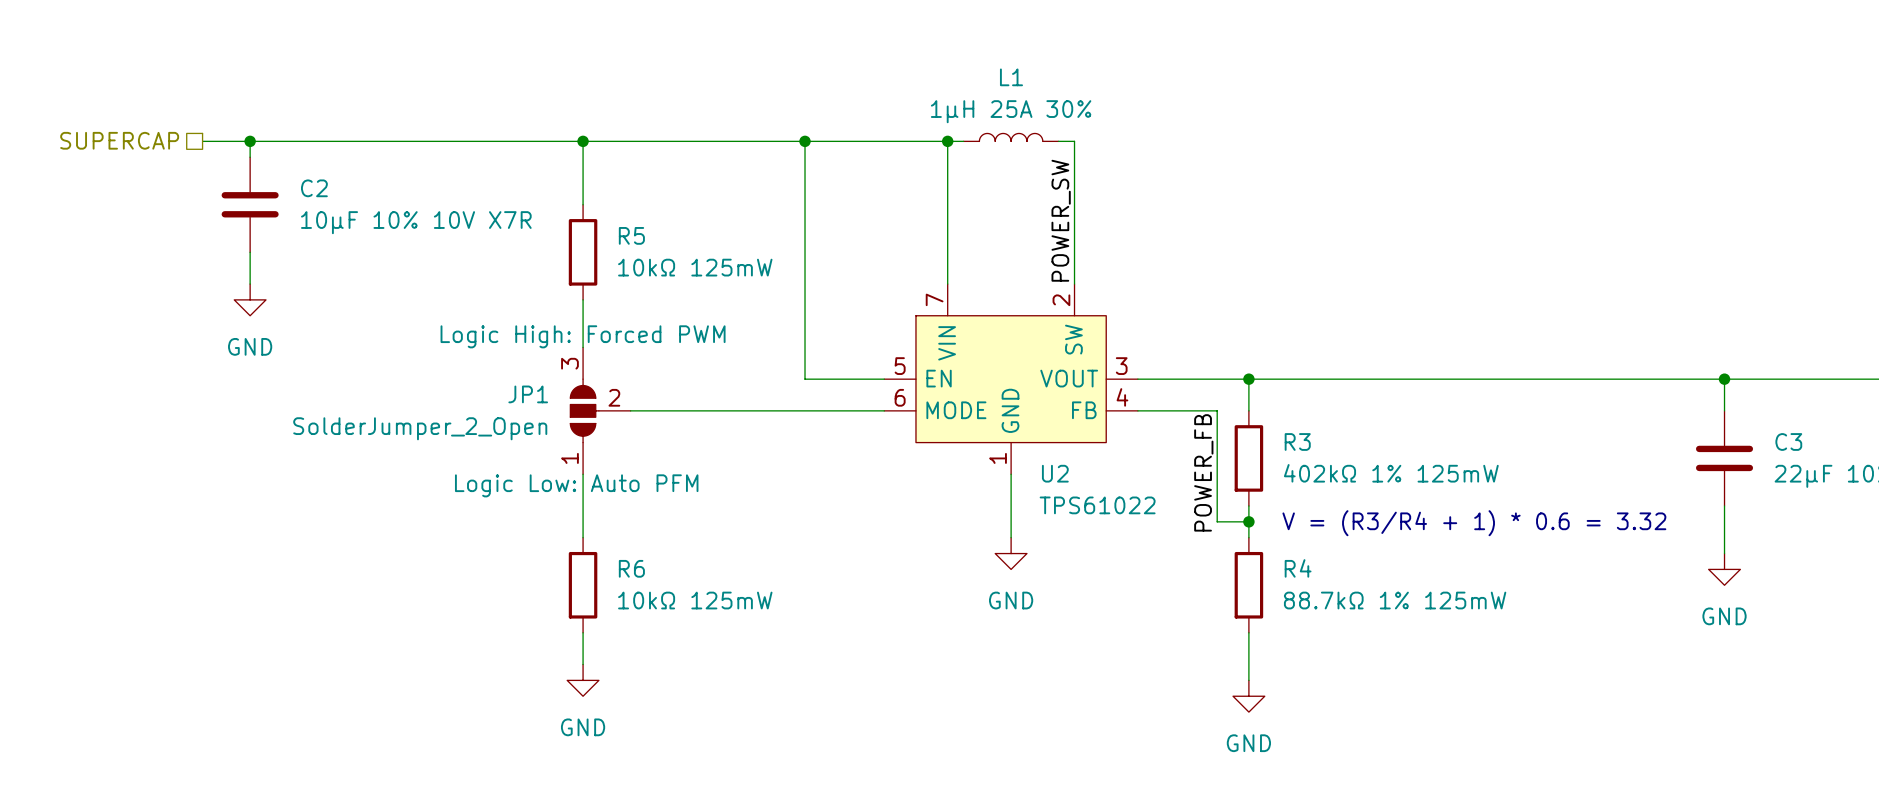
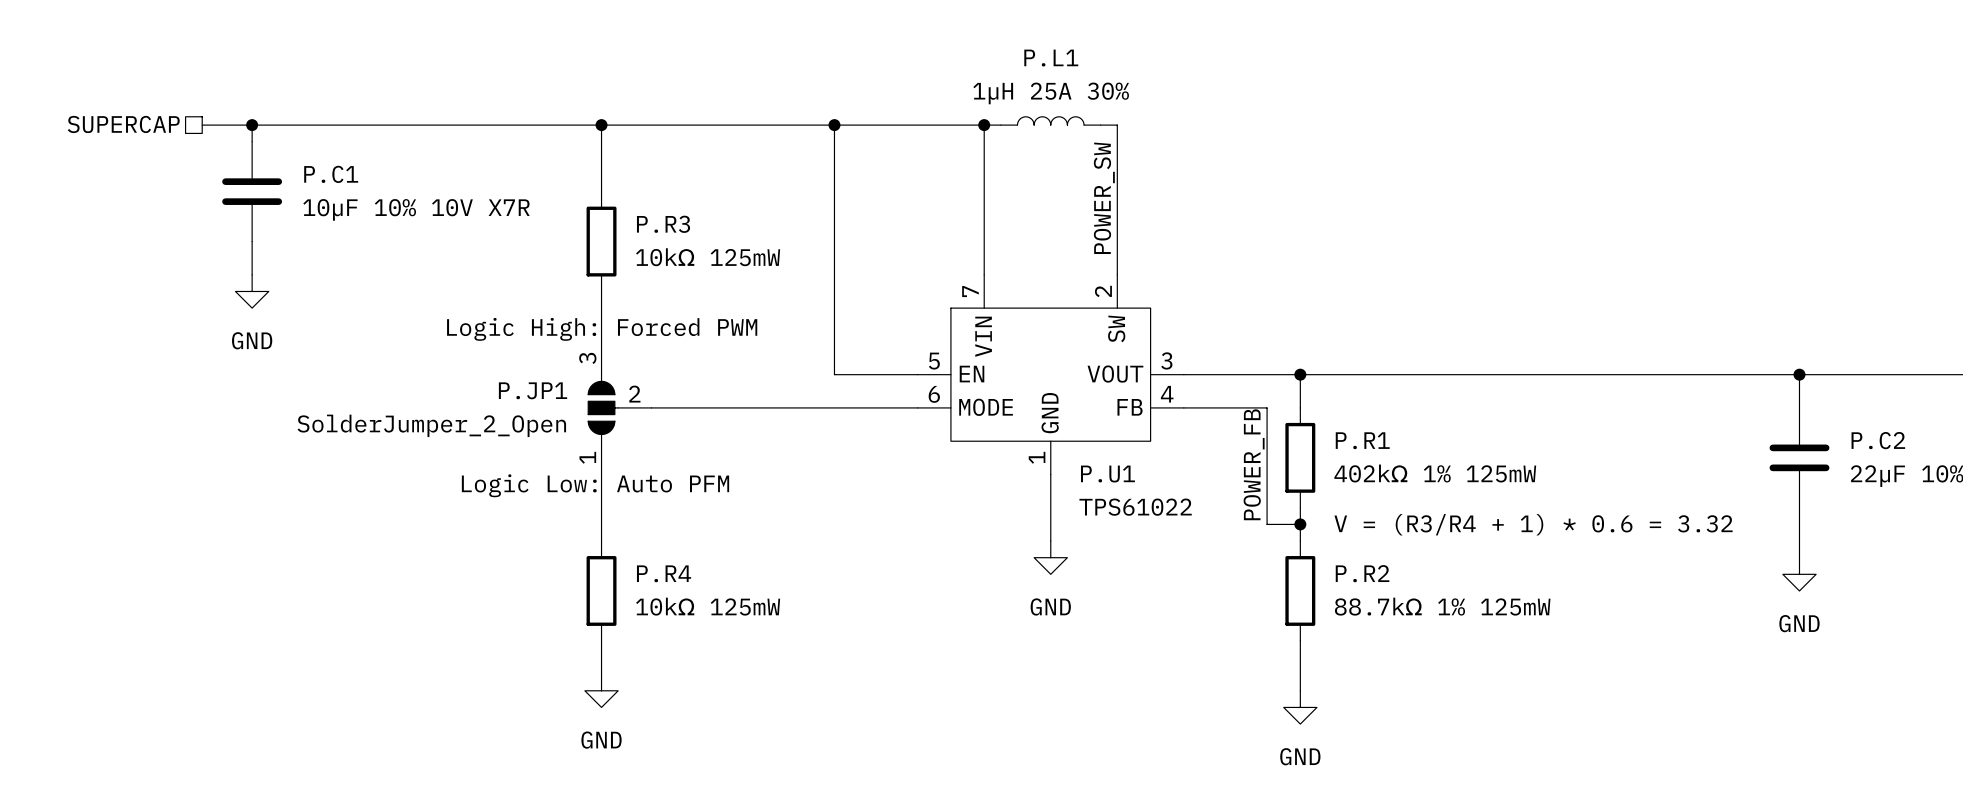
L1 name: L1 (1011, 77) -> P.L1 (1051, 58)
C2 name: C2 (314, 188) -> P.C1 (331, 174)
R5 name: R5 (631, 235) -> P.R3 (663, 224)
JP1 name: JP1 (528, 394) -> P.JP1 (533, 390)
R3 name: R3 (1297, 441) -> P.R1 (1362, 440)
C3 name: C3 (1788, 441) -> P.C2 (1878, 440)
U2 name: U2 (1055, 473) -> P.U1 (1107, 474)
R6 name: R6 (631, 568) -> P.R4 (664, 573)
R4 name: R4 (1298, 568) -> P.R2 (1362, 573)

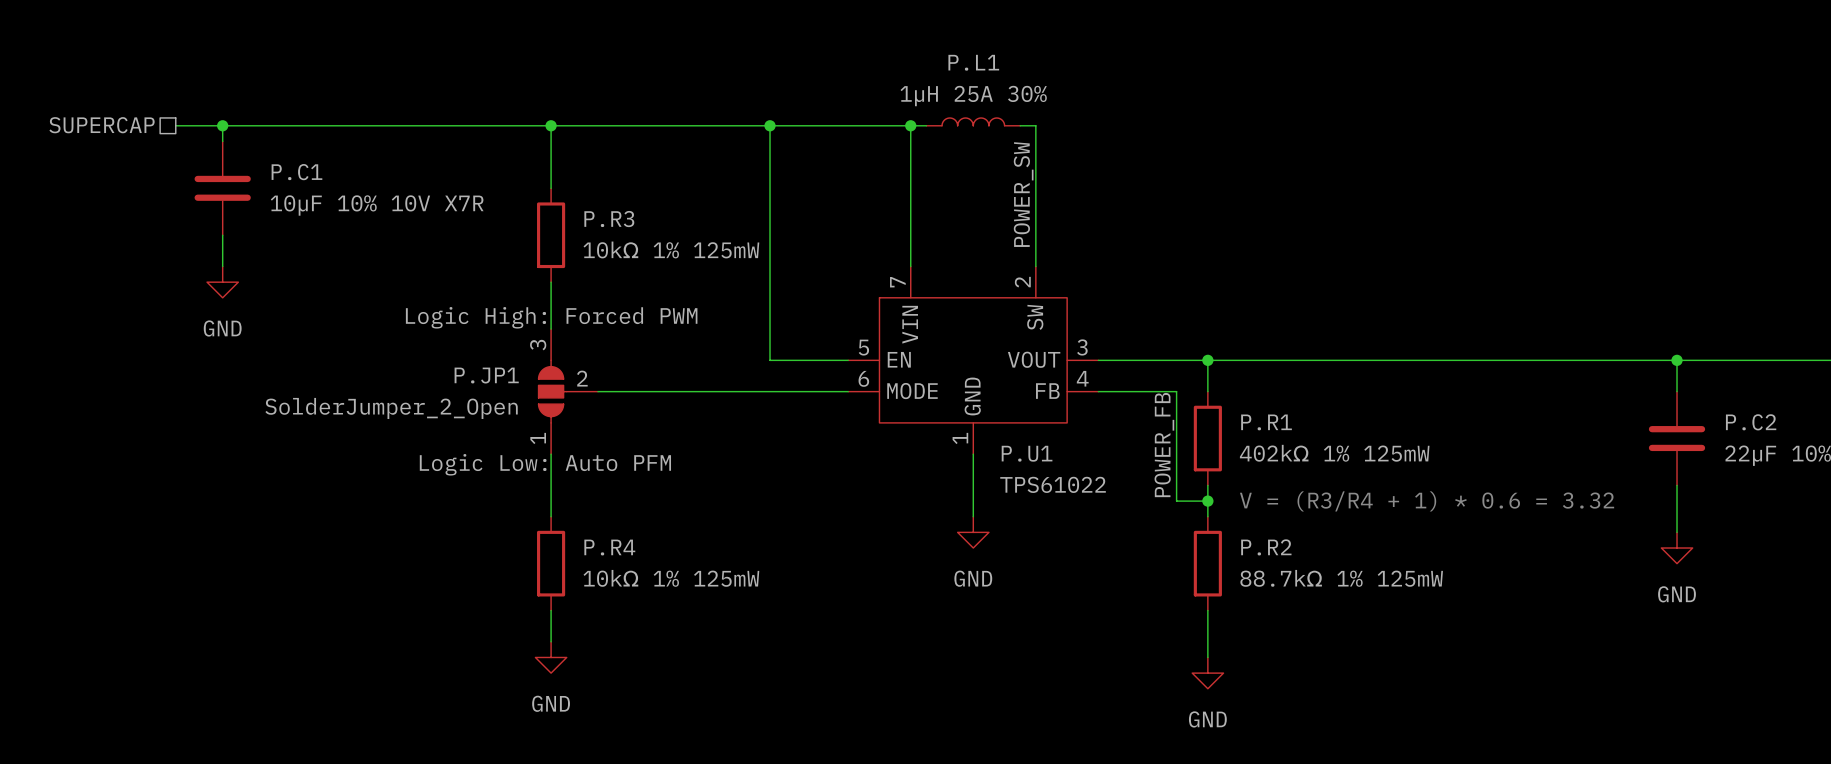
P.R3 value: 10kΩ 125mW (708, 257) -> 10kΩ 1% 125mW (671, 249)
P.R4 value: 10kΩ 125mW (708, 606) -> 10kΩ 1% 125mW (671, 578)

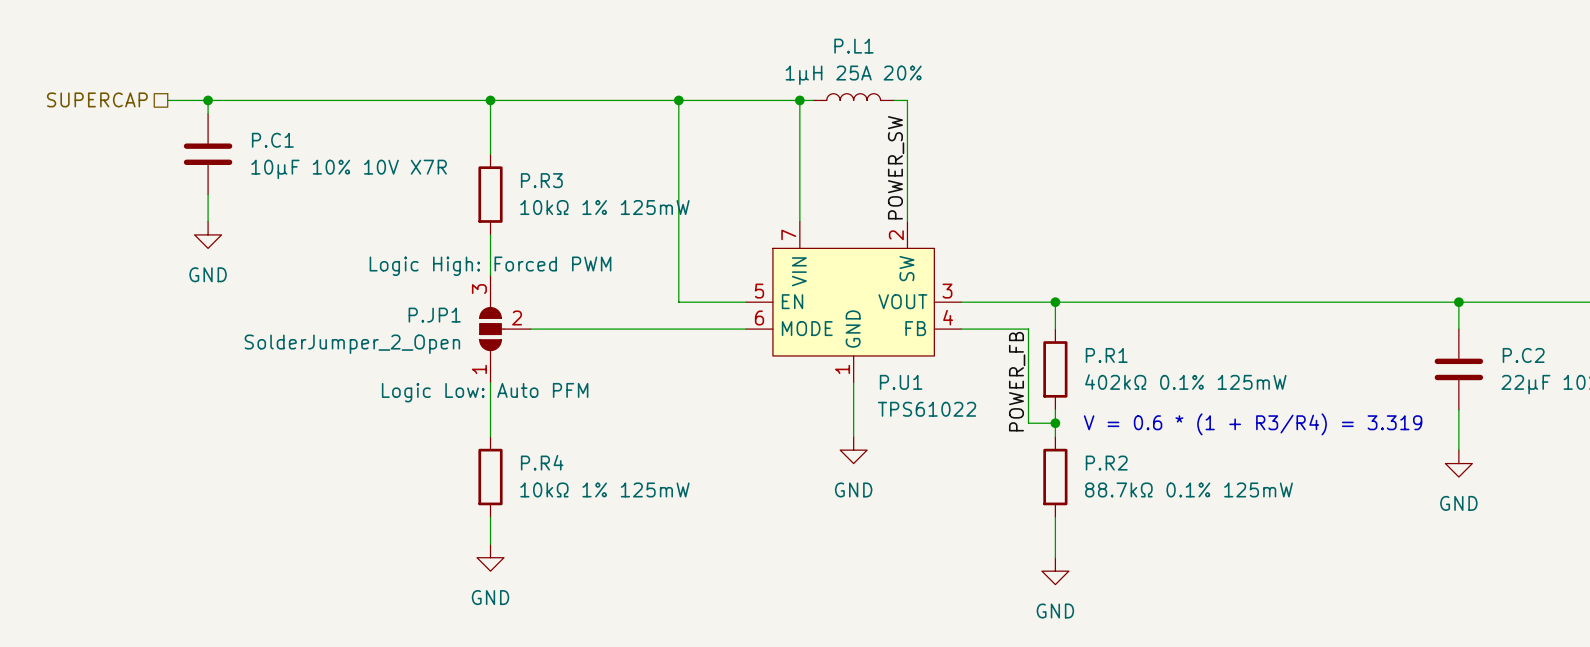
P.L1 value: 1µH 25A 30% (973, 96) -> 1µH 25A 20% (853, 75)
P.R1 value: 402kΩ 1% 125mW (1334, 453) -> 402kΩ 0.1% 125mW (1185, 382)
text: V = (R3/R4 + 1) * 0.6 = 3.32 (1427, 501) -> V = 0.6 * (1 + R3/R4) = 3.319 (1253, 424)
P.R2 value: 88.7kΩ 1% 125mW (1341, 578) -> 88.7kΩ 0.1% 125mW (1189, 489)

